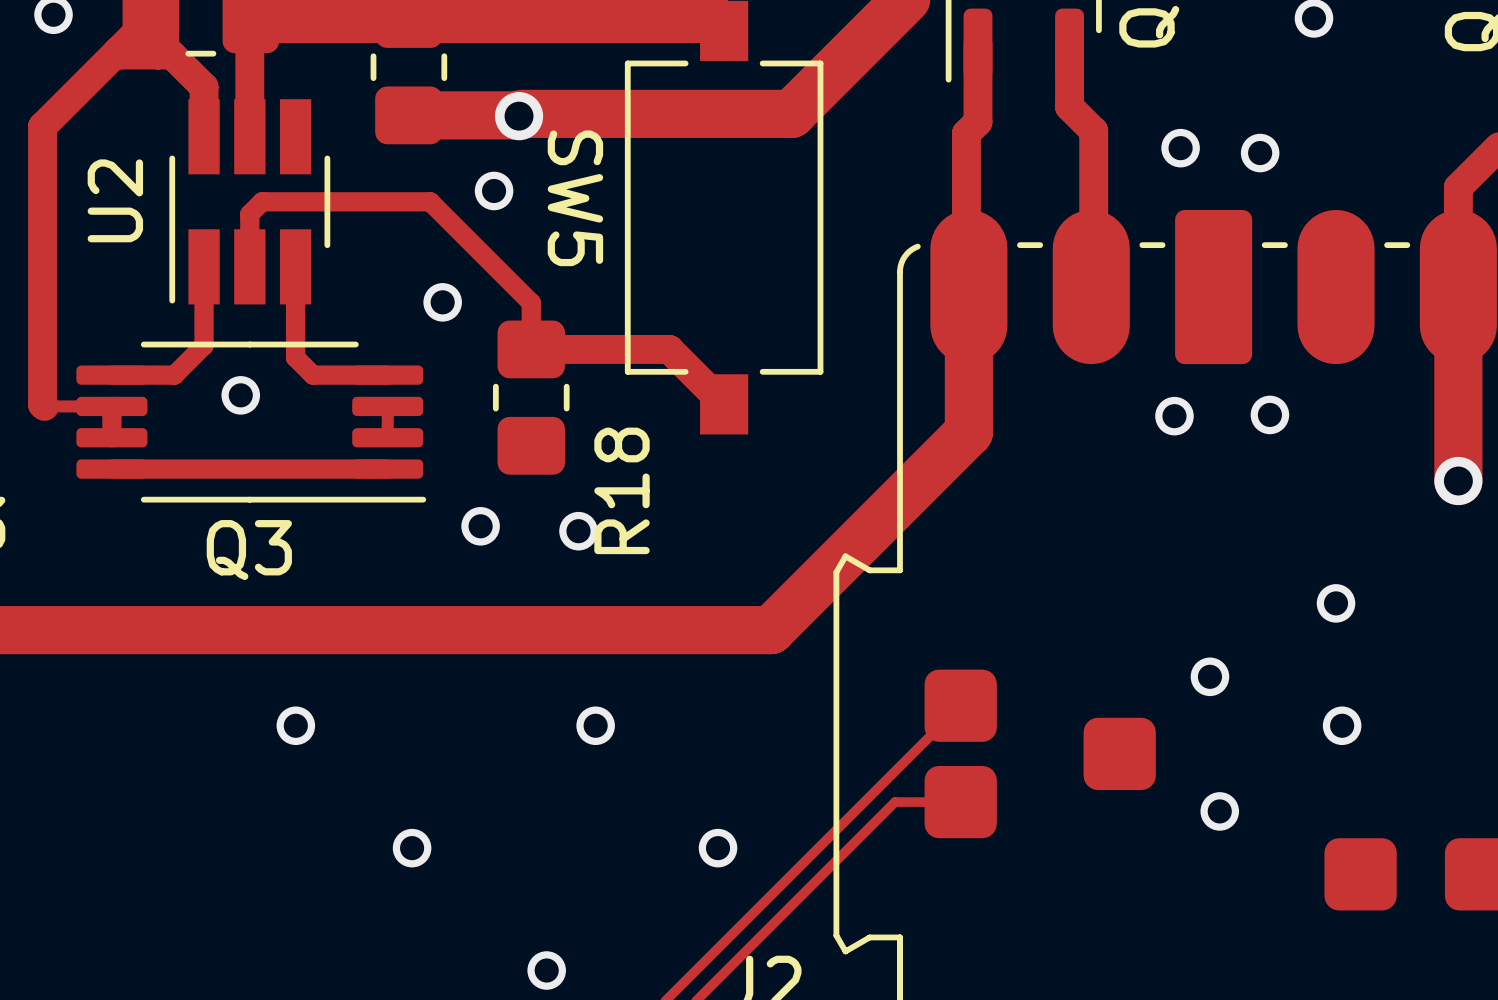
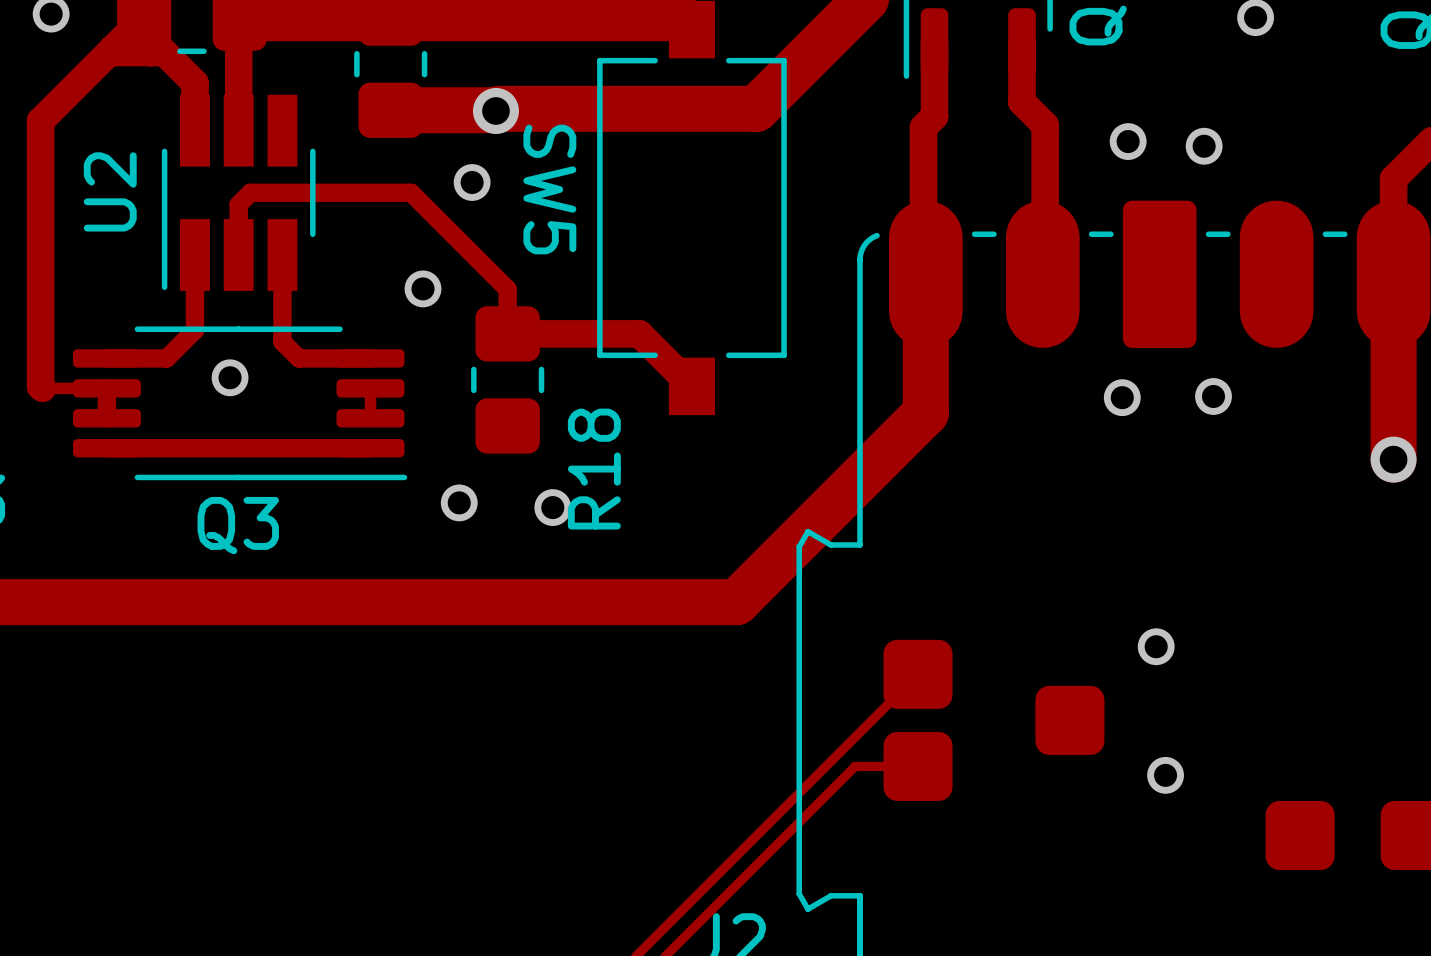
via: (1336, 603) -> none
via: (295, 725) -> none
via: (595, 725) -> none
via: (1342, 725) -> none
via: (412, 848) -> none
via: (718, 848) -> none
via: (546, 970) -> none

